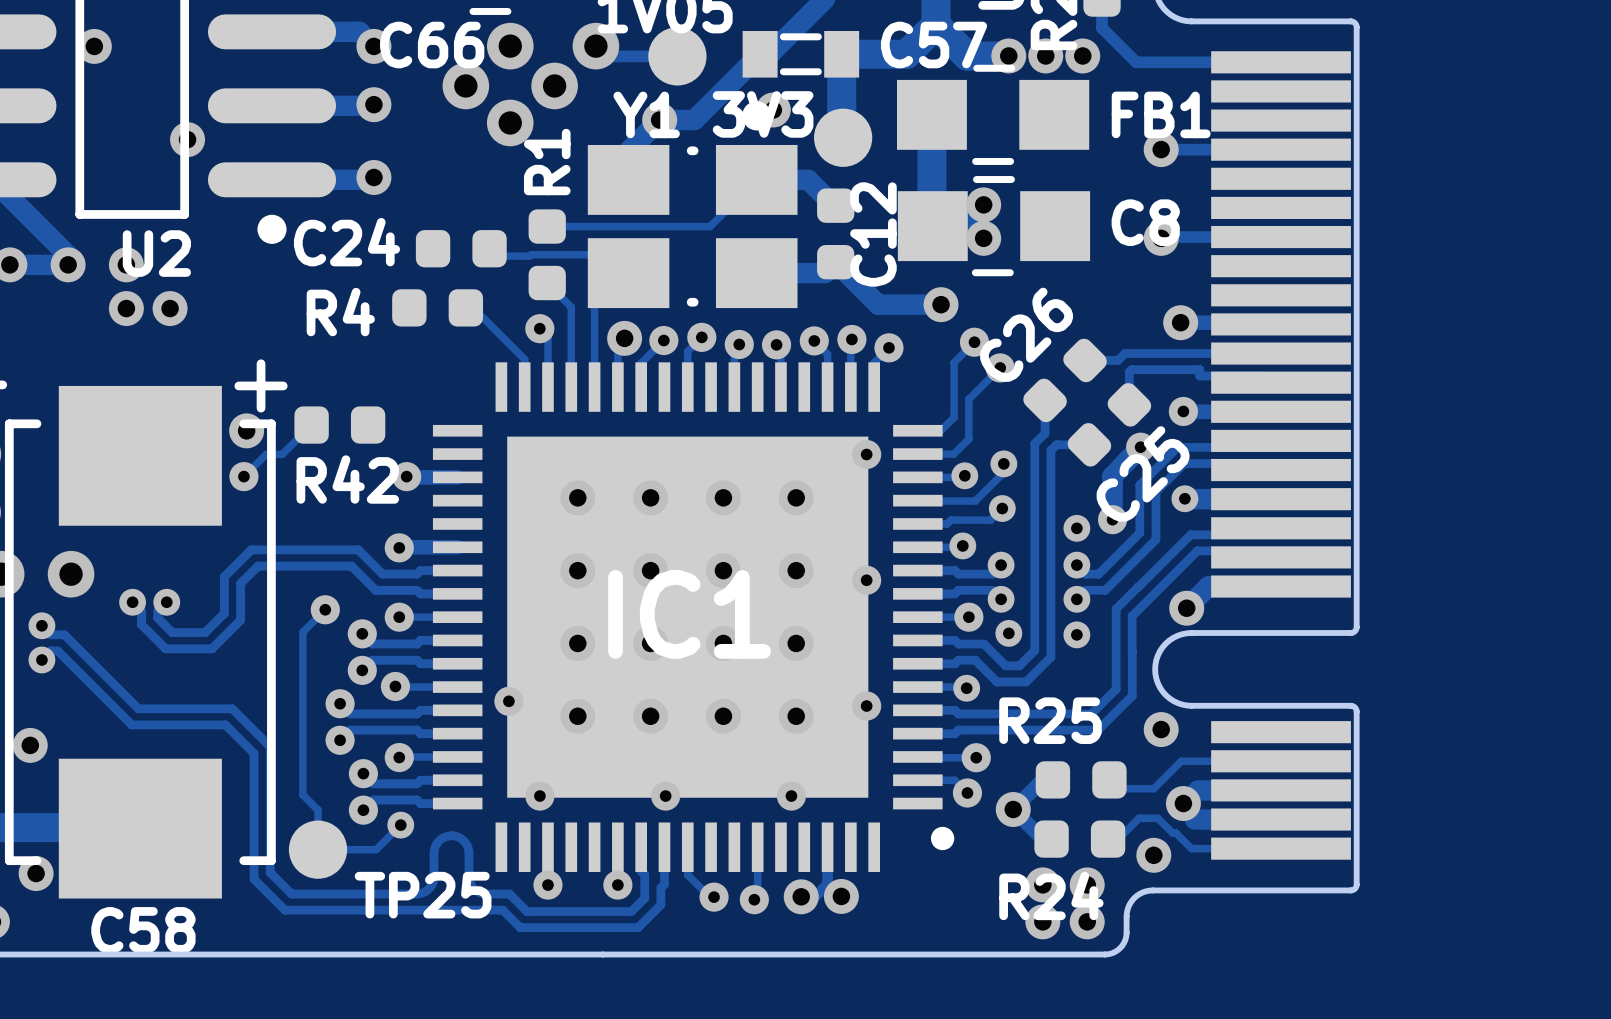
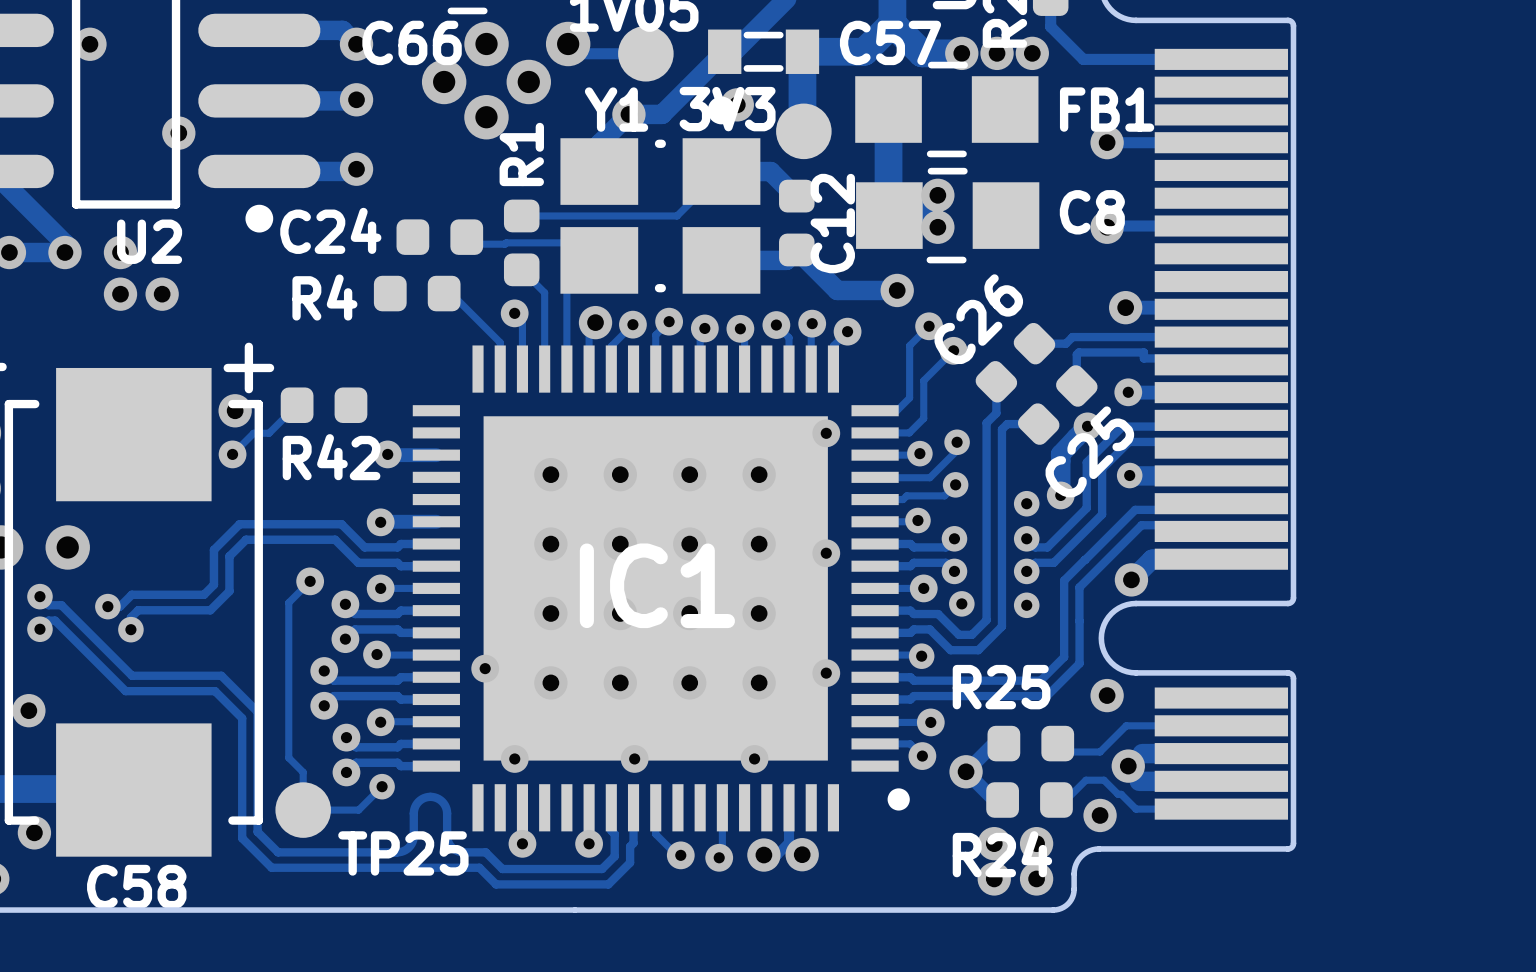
track: (132, 602) (141, 611) (141, 624) (165, 648) (211, 648) (220, 640) -> (130, 629) (130, 617) (138, 610) (210, 610)
via: (132, 602) -> none
track: (166, 602) (157, 611) (157, 617) (172, 632) (205, 632) (213, 623) -> (107, 606) (119, 606) (131, 594) (203, 594)
via: (166, 602) -> none
via: none -> (107, 606)
via: none -> (130, 629)

